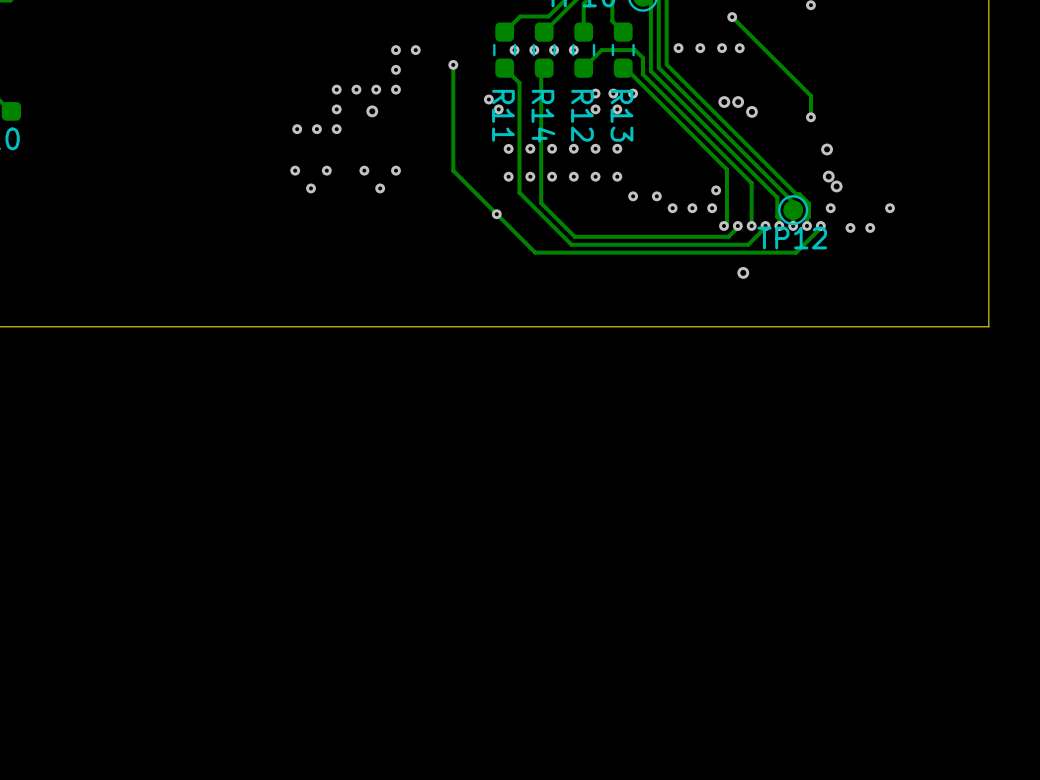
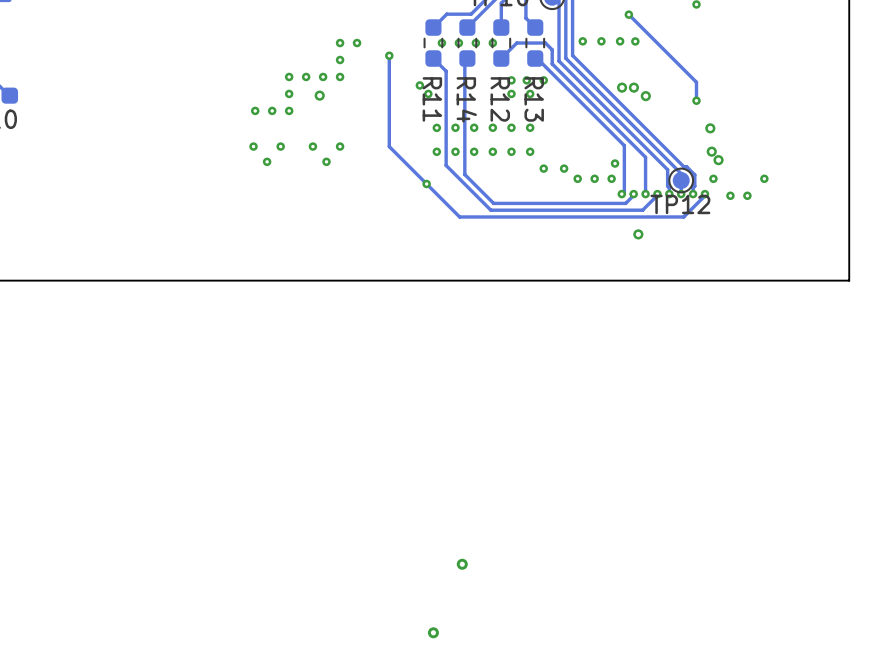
via: none -> (462, 564)
via: none -> (433, 632)

